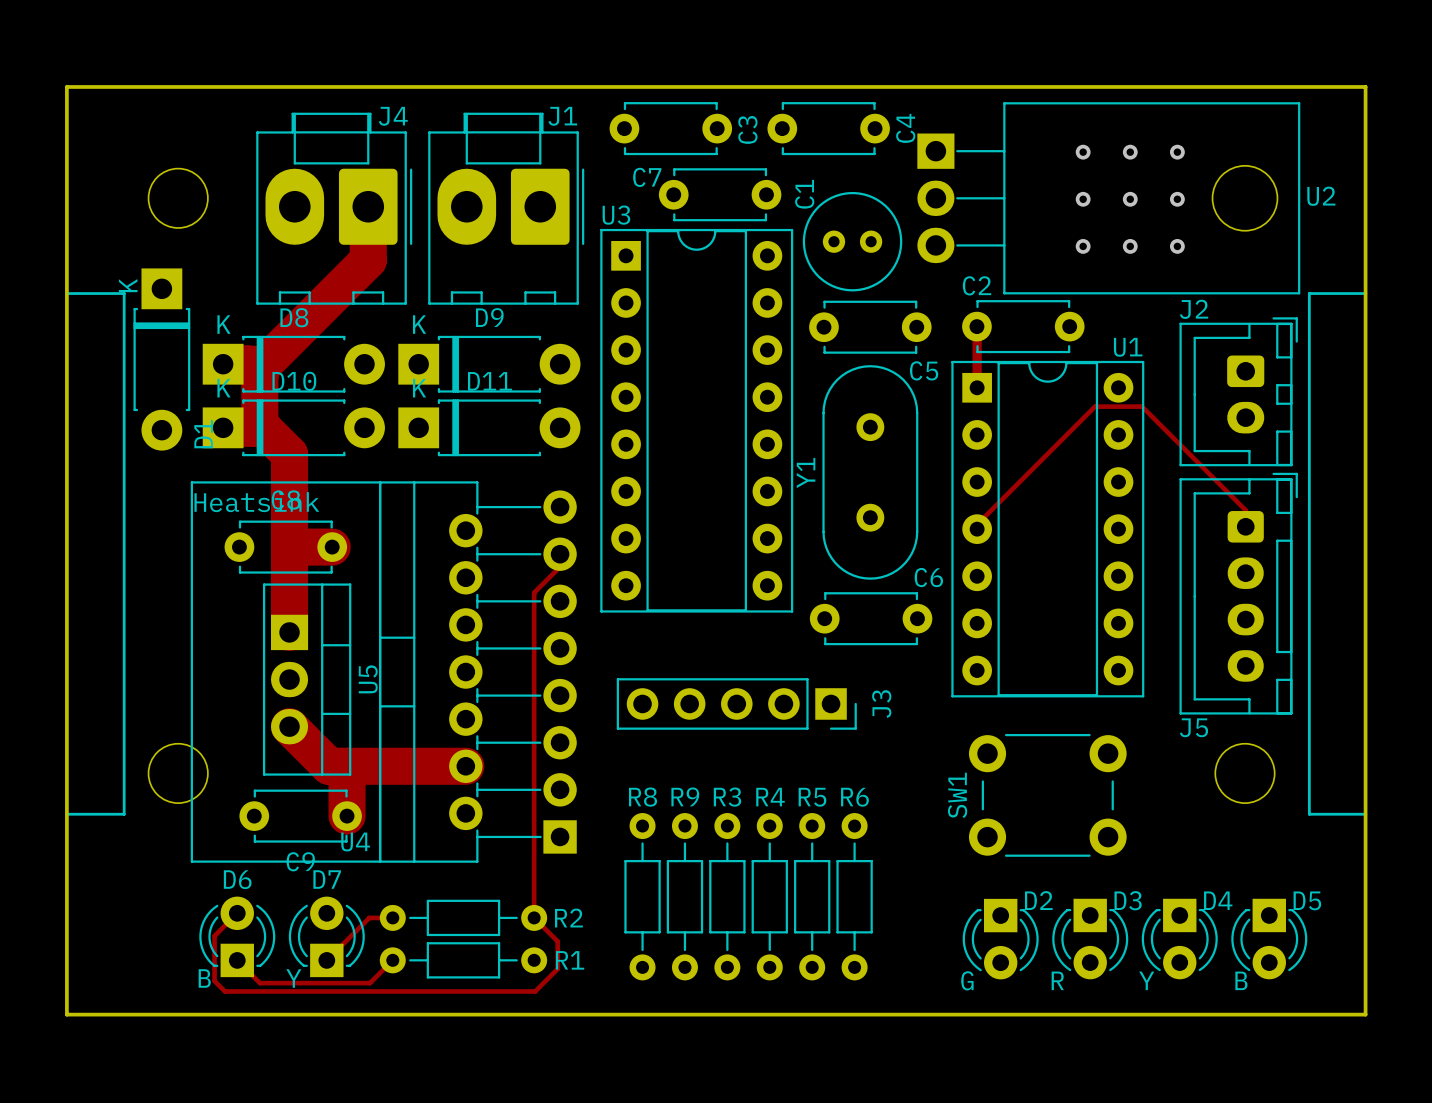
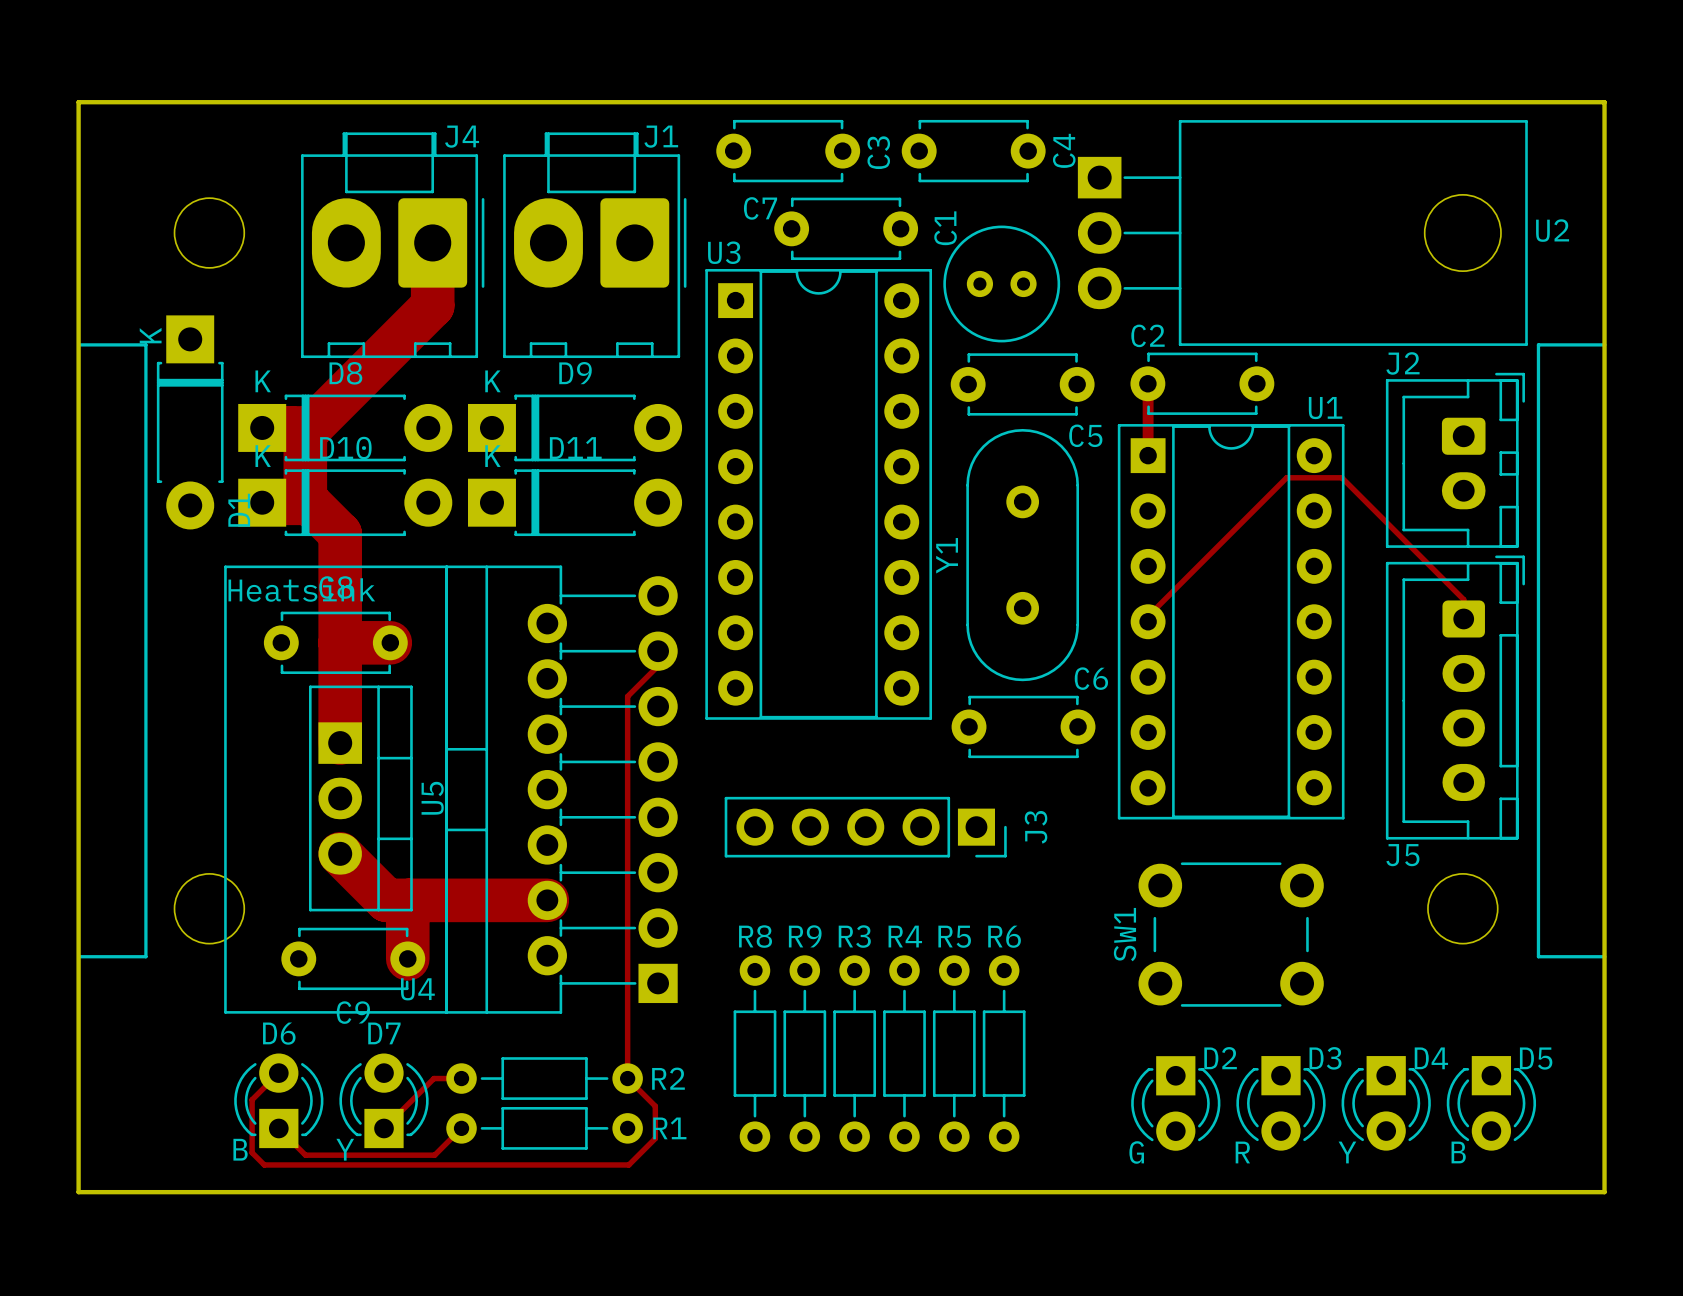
via: (1083, 152) -> none
via: (1130, 152) -> none
via: (1177, 152) -> none
via: (1083, 199) -> none
via: (1130, 199) -> none
via: (1177, 199) -> none
via: (1083, 246) -> none
via: (1130, 246) -> none
via: (1177, 246) -> none

